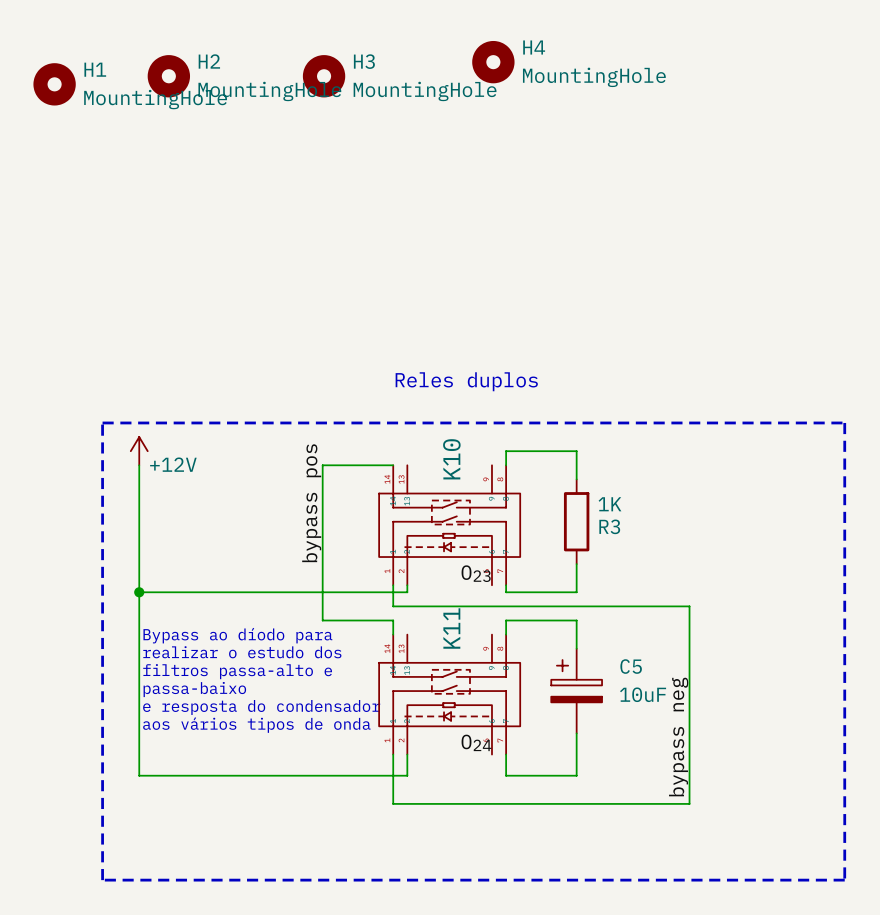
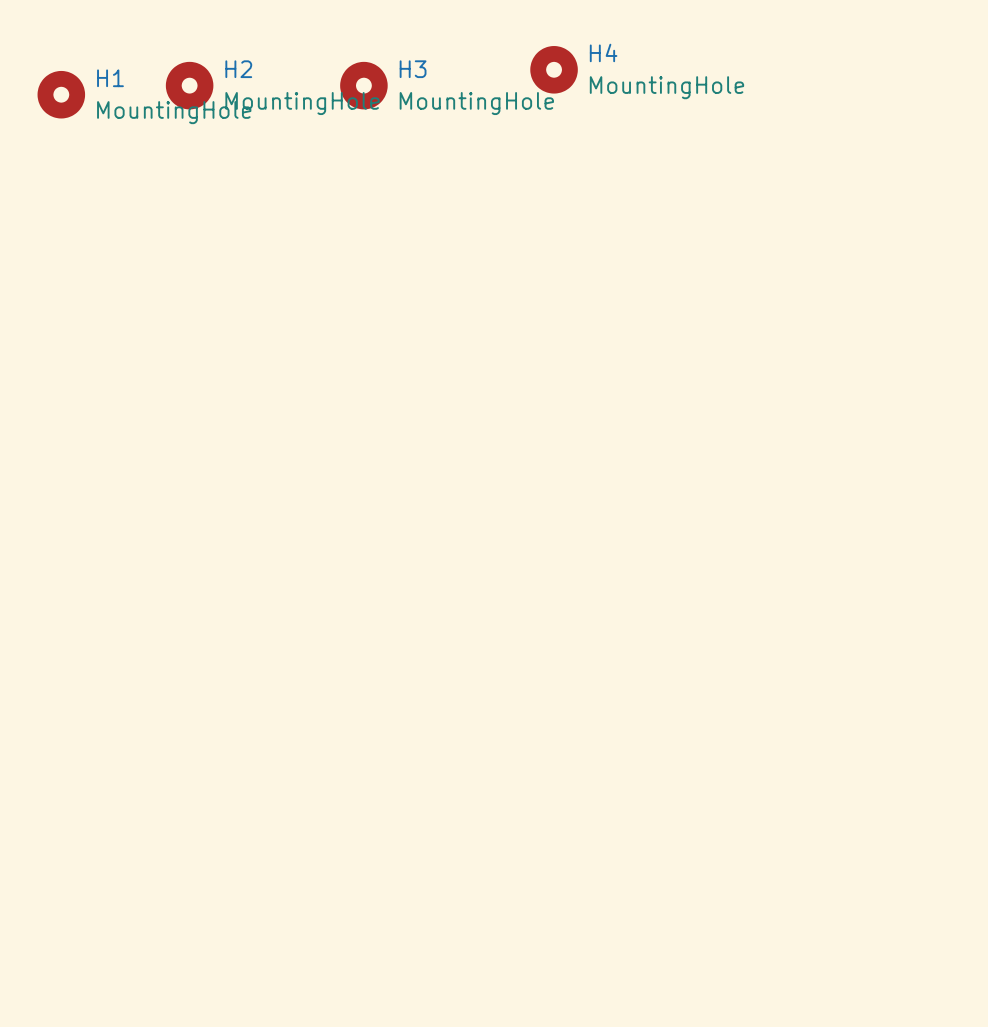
text: Reles duplos (466, 381) -> none
line: (102, 422) (844, 422) (844, 880) (102, 880) (102, 422) -> none
power symbol: +12V (139, 451) -> none
wire: (139, 465) (139, 775) (407, 775) (407, 754) -> none
wire: (393, 465) (322, 465) (322, 620) (393, 620) (393, 634) -> none
wire: (506, 465) (506, 451) (576, 451) (576, 479) -> none
label: bypass pos (311, 503) -> none
R3: 1K (576, 521) -> none
K10: (449, 525) -> none
wire: (576, 564) (576, 592) (506, 592) (506, 585) -> none
label: O23 (476, 573) -> none
wire: (393, 585) (393, 606) (689, 606) (689, 803) (393, 803) (393, 754) -> none
wire: (407, 585) (407, 592) (139, 592) -> none
junction: (139, 592) -> none
wire: (506, 634) (506, 620) (576, 620) (576, 648) -> none
text: Bypass ao díodo para (237, 635) -> none
text: realizar o estudo dos (242, 652) -> none
text: filtros passa-alto e (237, 671) -> none
text: passa-baixo (194, 689) -> none
C5: 10uF (576, 691) -> none
K11: (449, 694) -> none
text: e resposta do condensador (261, 707) -> none
text: aos vários tipos de onda (256, 725) -> none
wire: (576, 733) (576, 775) (506, 775) (506, 754) -> none
label: bypass neg (678, 737) -> none
label: O24 (476, 742) -> none

